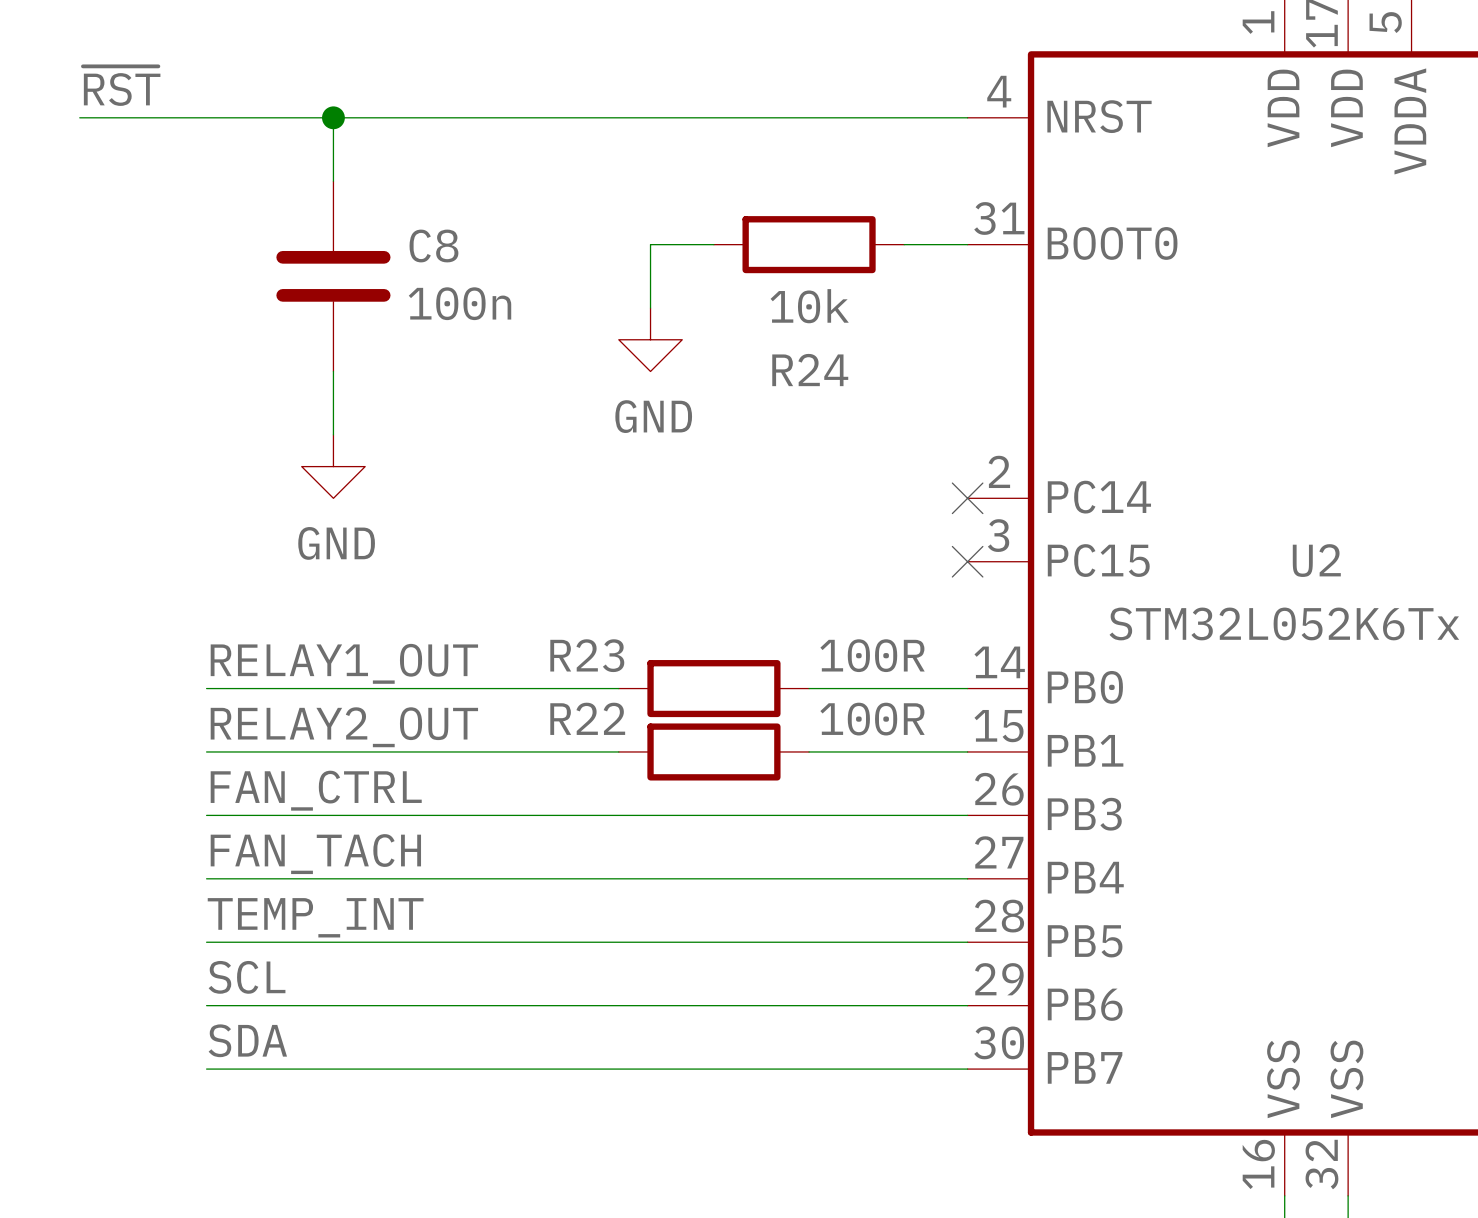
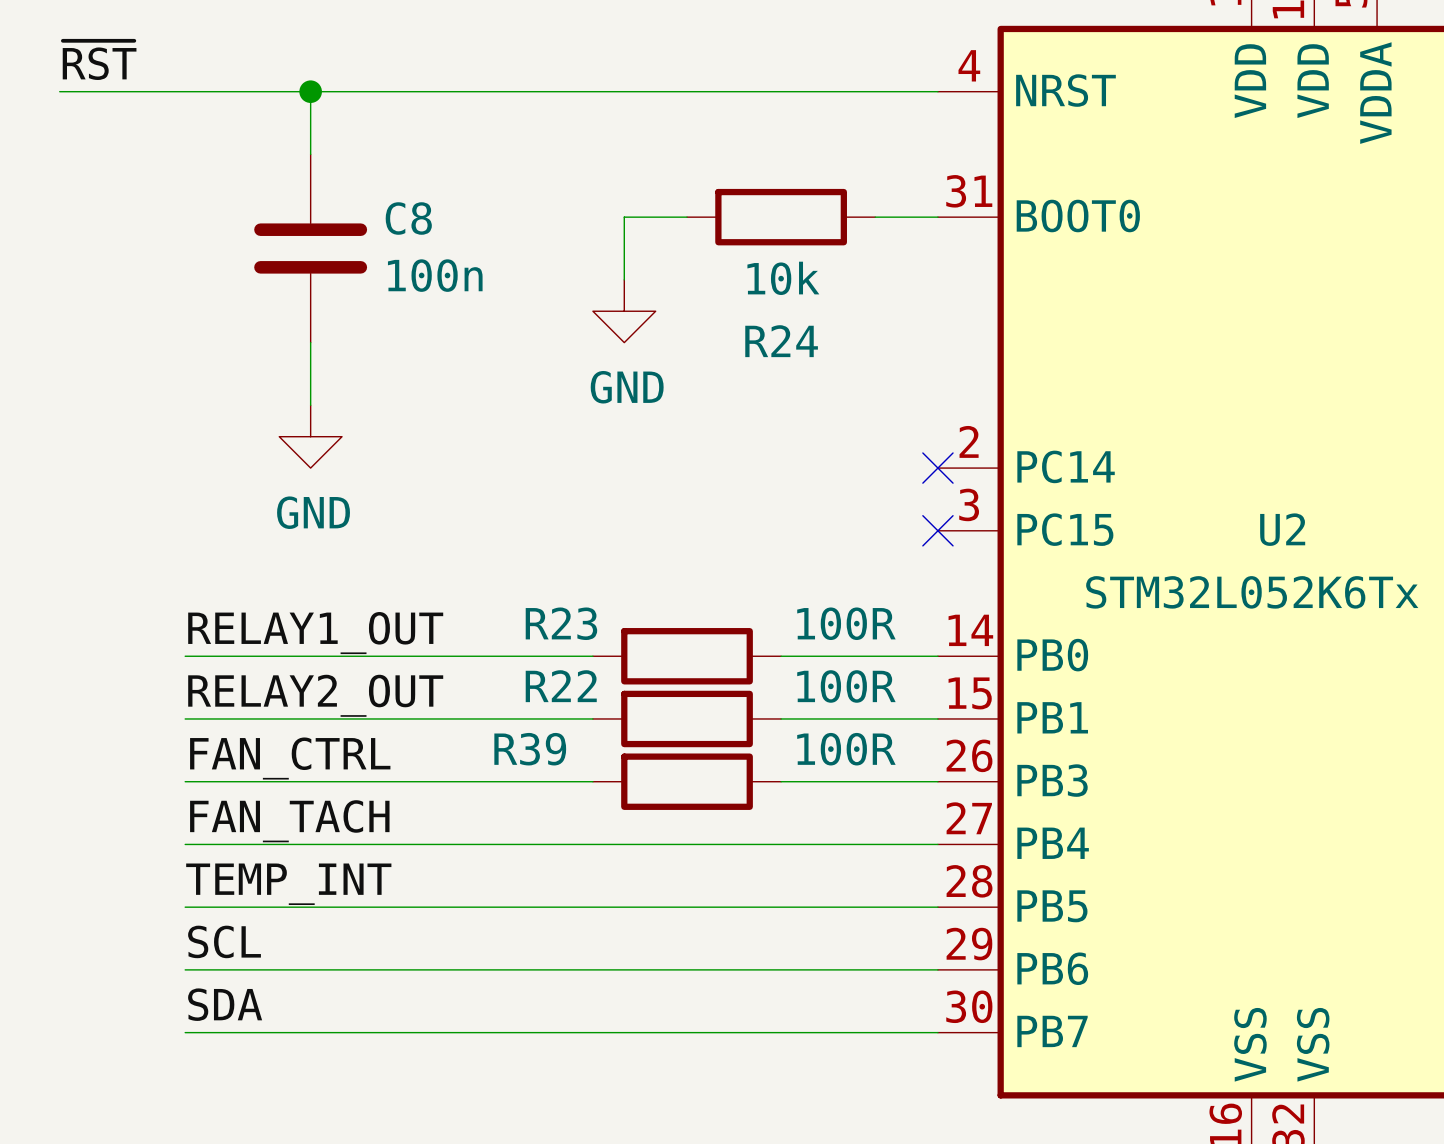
wire: (618, 815) (809, 815) -> none
R39: none -> 100R (687, 781)

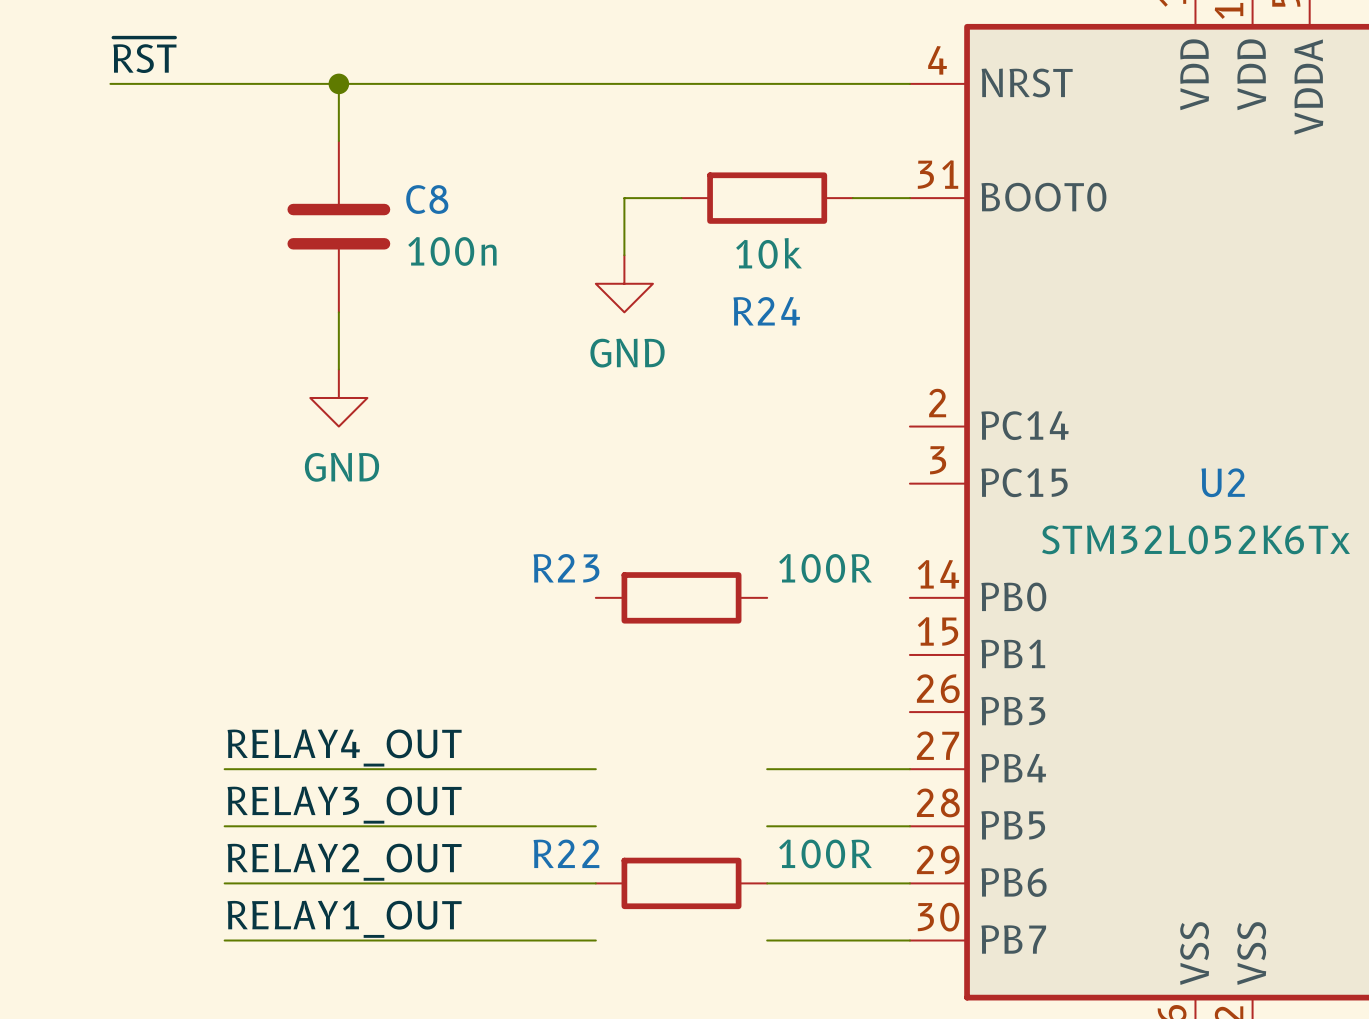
no-connect mark: (937, 468) -> none
no-connect mark: (937, 530) -> none
label: RELAY1_OUT (315, 633) -> none
wire: (185, 656) (592, 656) -> none
wire: (781, 656) (937, 656) -> none
label: RELAY2_OUT (315, 695) -> none
wire: (185, 718) (592, 718) -> none
R22 position: (687, 718) -> (681, 883)
wire: (781, 718) (937, 718) -> none
label: FAN_CTRL (290, 758) -> none
wire: (185, 781) (592, 781) -> none
R39: 100R (687, 781) -> none
wire: (781, 781) (937, 781) -> none
label: FAN_TACH (289, 821) -> RELAY4_OUT (344, 747)
wire: (592, 844) (781, 844) -> none
label: TEMP_INT (288, 884) -> RELAY3_OUT (344, 805)
wire: (592, 907) (781, 907) -> none
label: SCL (224, 941) -> RELAY2_OUT (344, 862)
wire: (592, 969) (781, 969) -> none
label: SDA (225, 1004) -> RELAY1_OUT (344, 919)
wire: (592, 1032) (781, 1032) -> none

